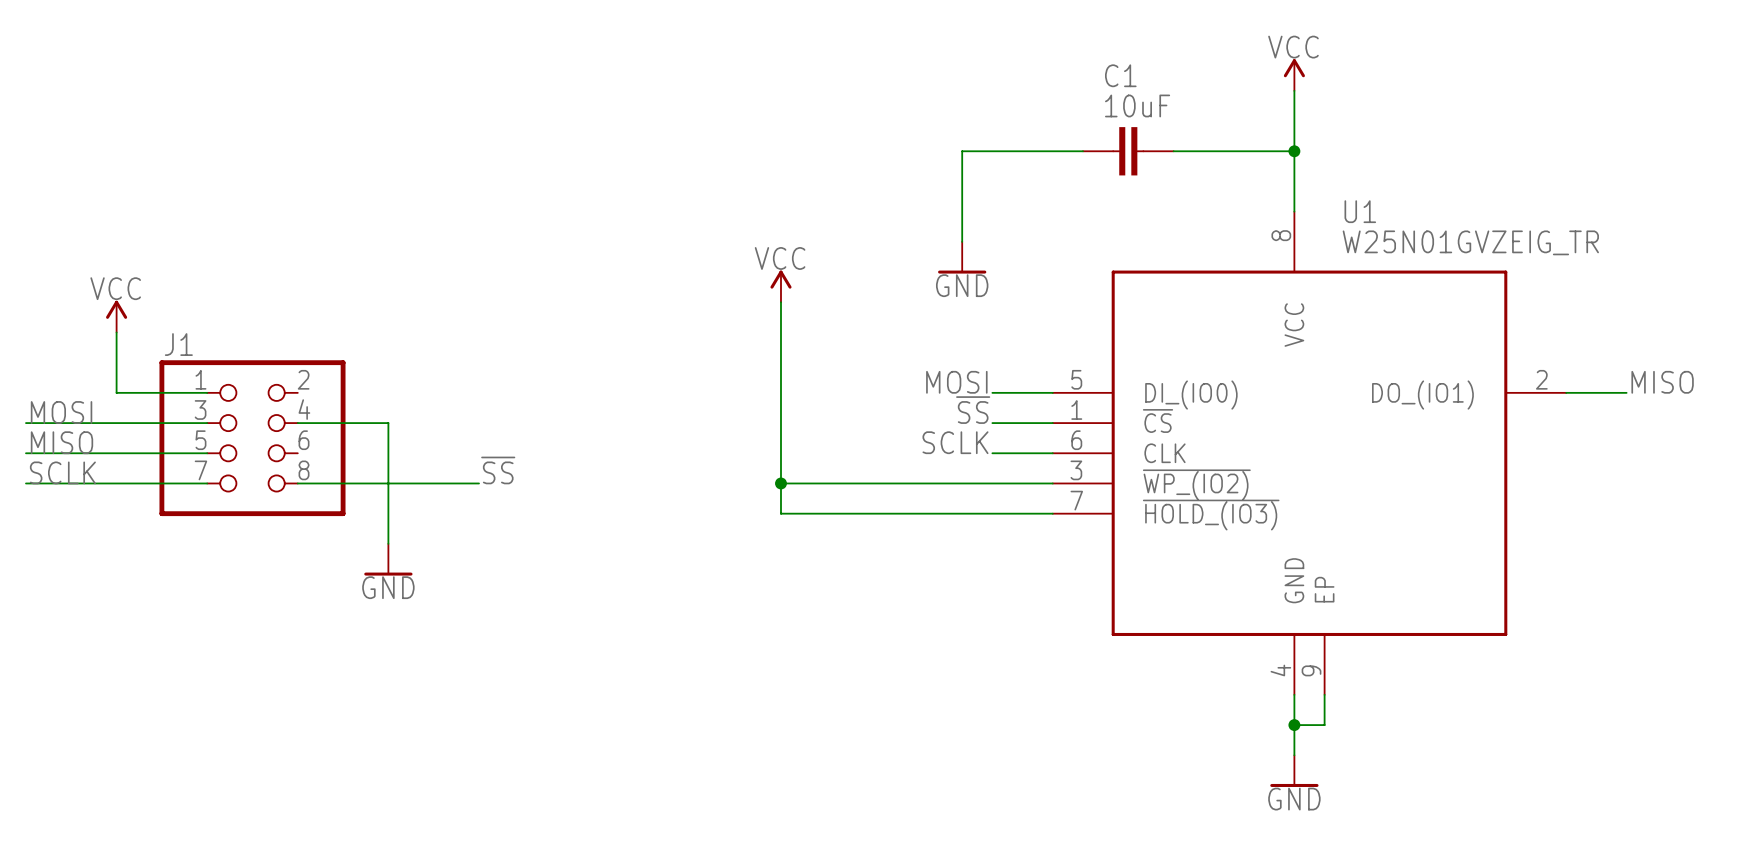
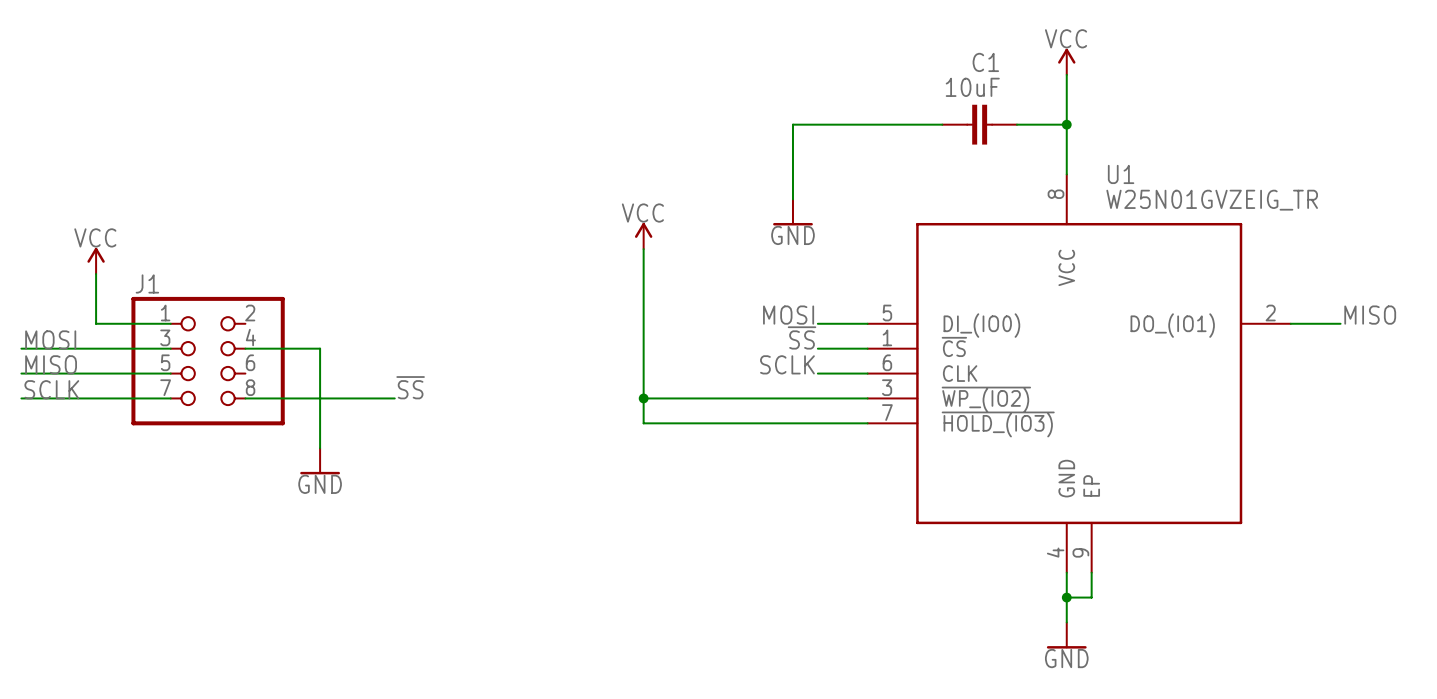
C1 name position: C1 (1120, 75) -> C1 (985, 62)
C1 value position: 10uF (1137, 105) -> 10uF (972, 87)
C1 position: (1128, 151) -> (979, 124)

